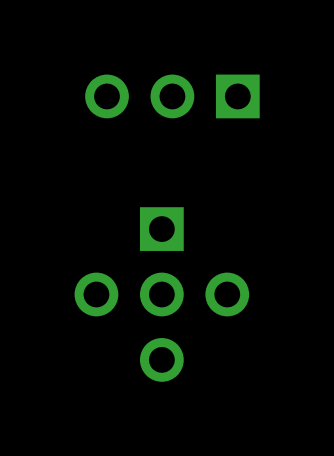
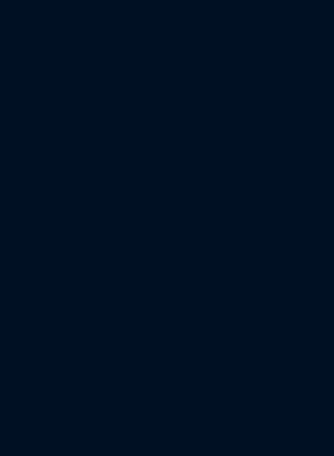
part: (172, 96) -> none
part: (161, 294) -> none

